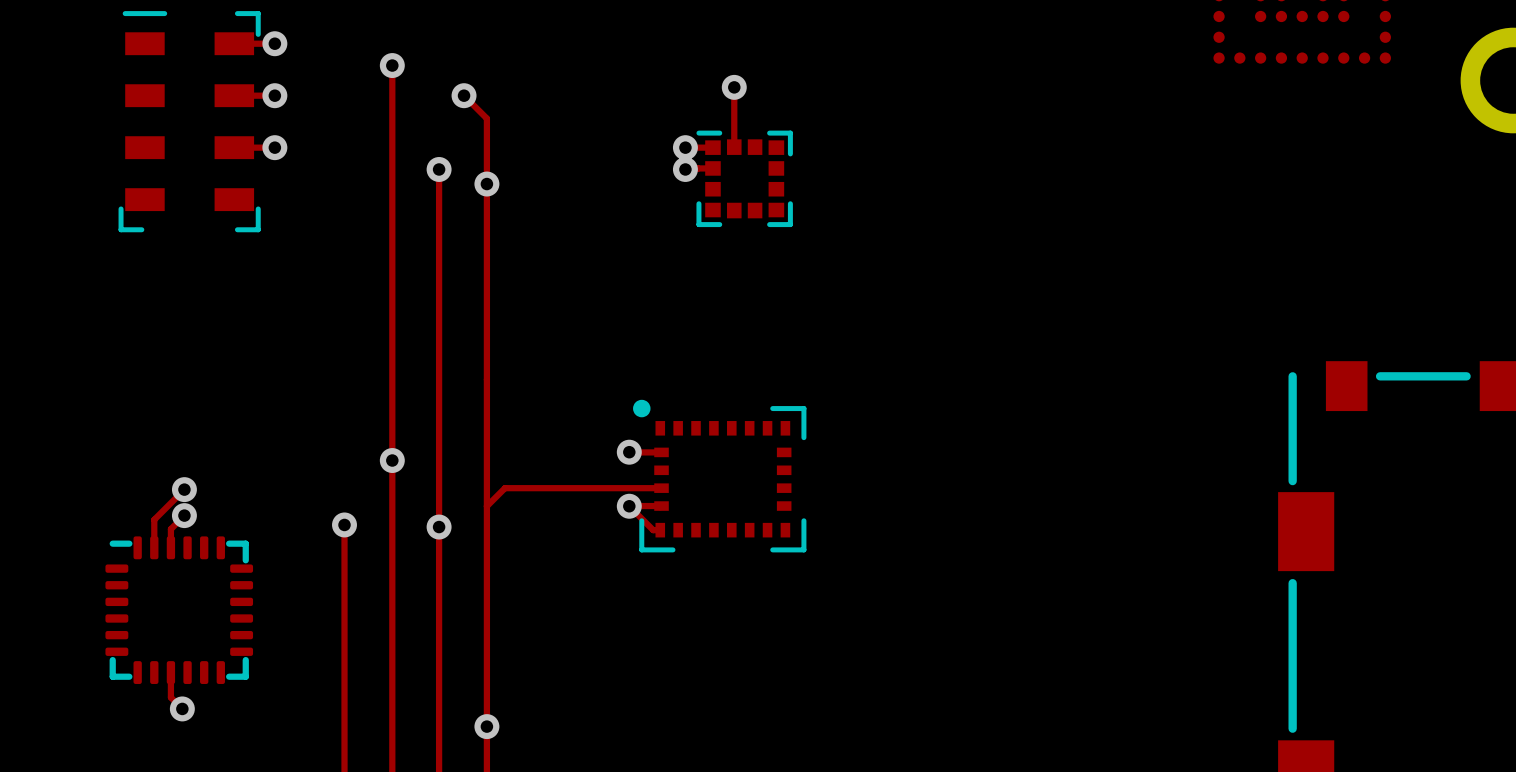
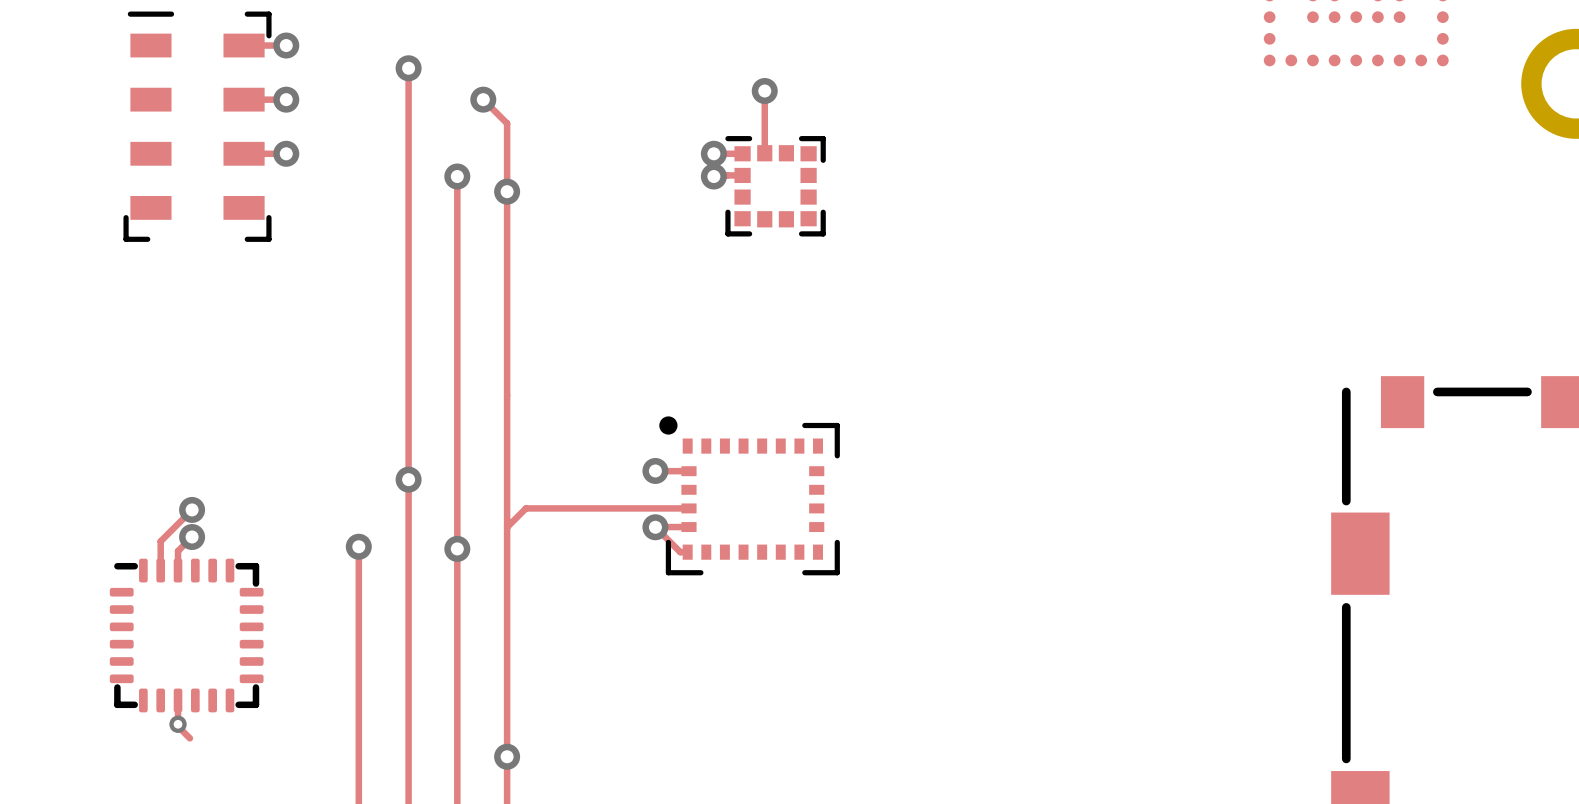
via position: (182, 708) -> (178, 724)

